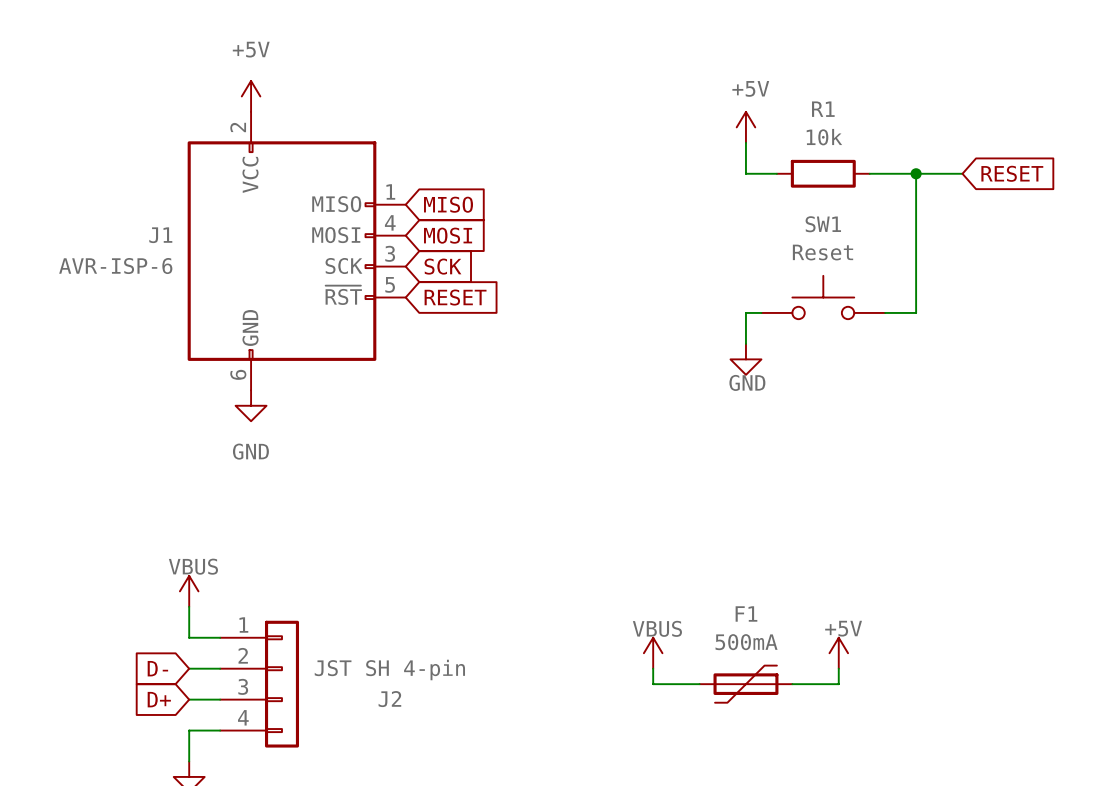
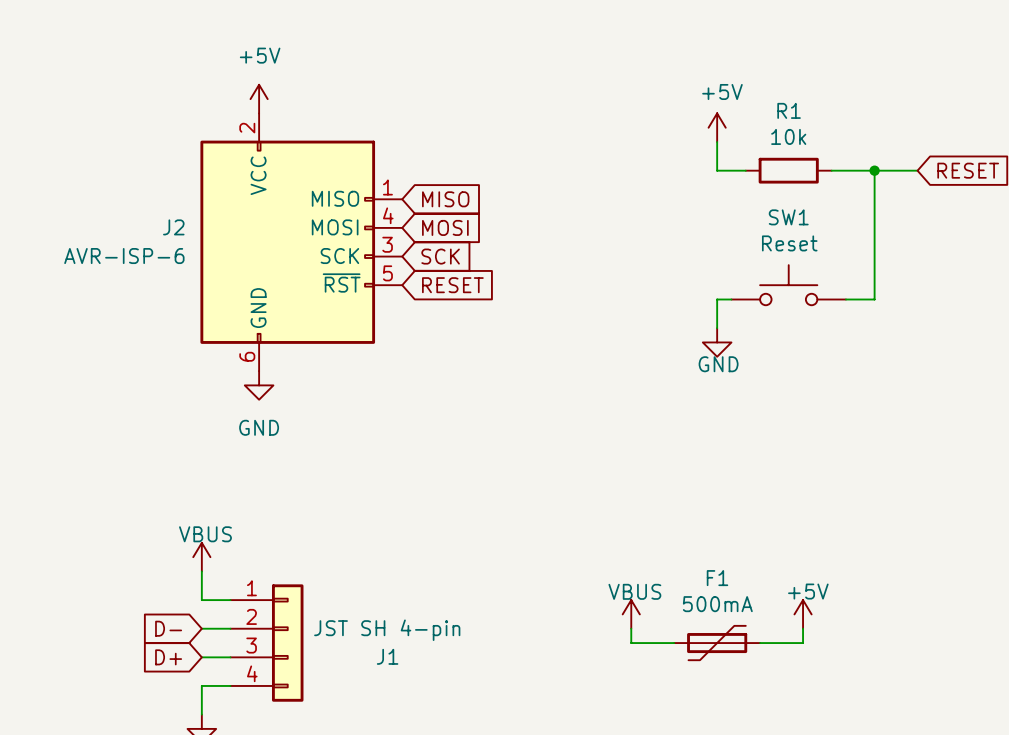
J1 name: J1 (160, 235) -> J2 (173, 227)
J2 name: J2 (389, 699) -> J1 (387, 656)

